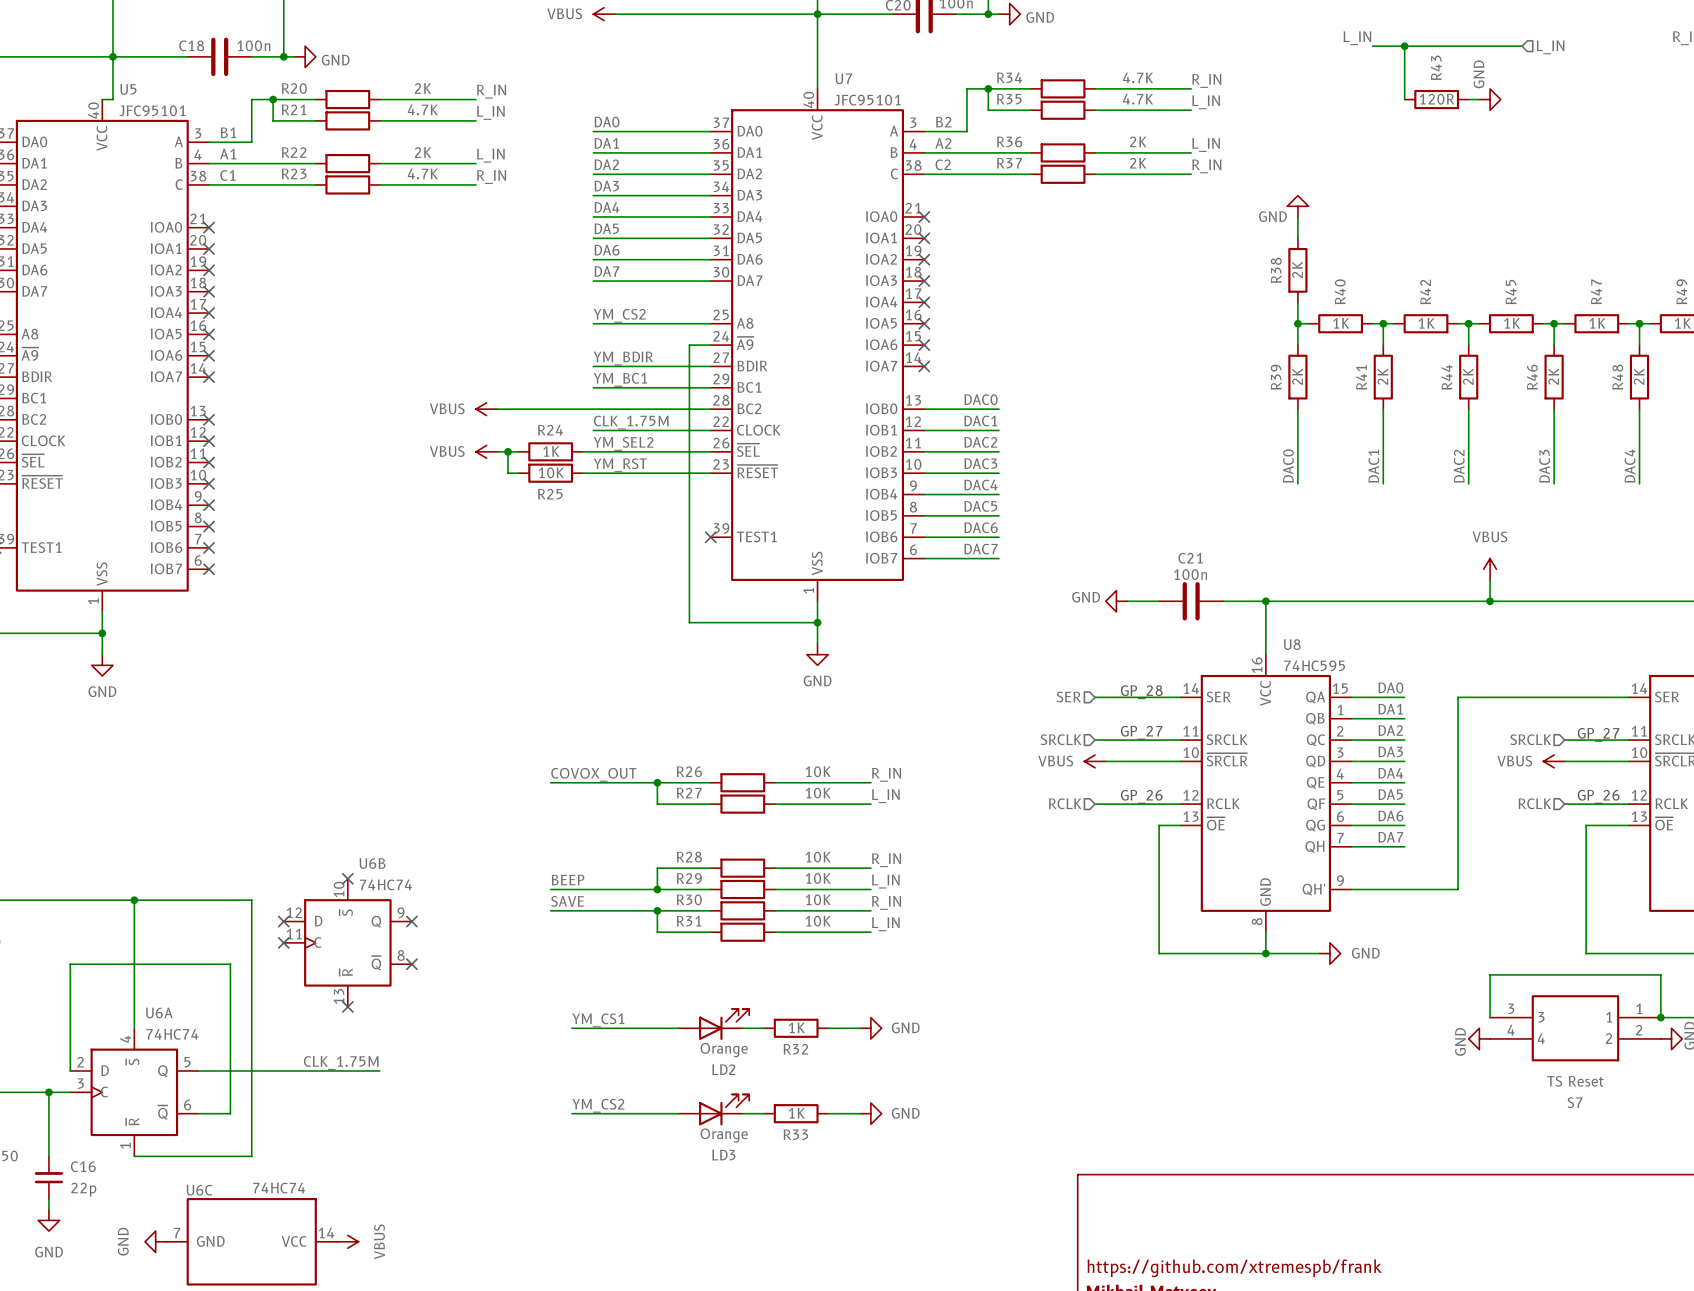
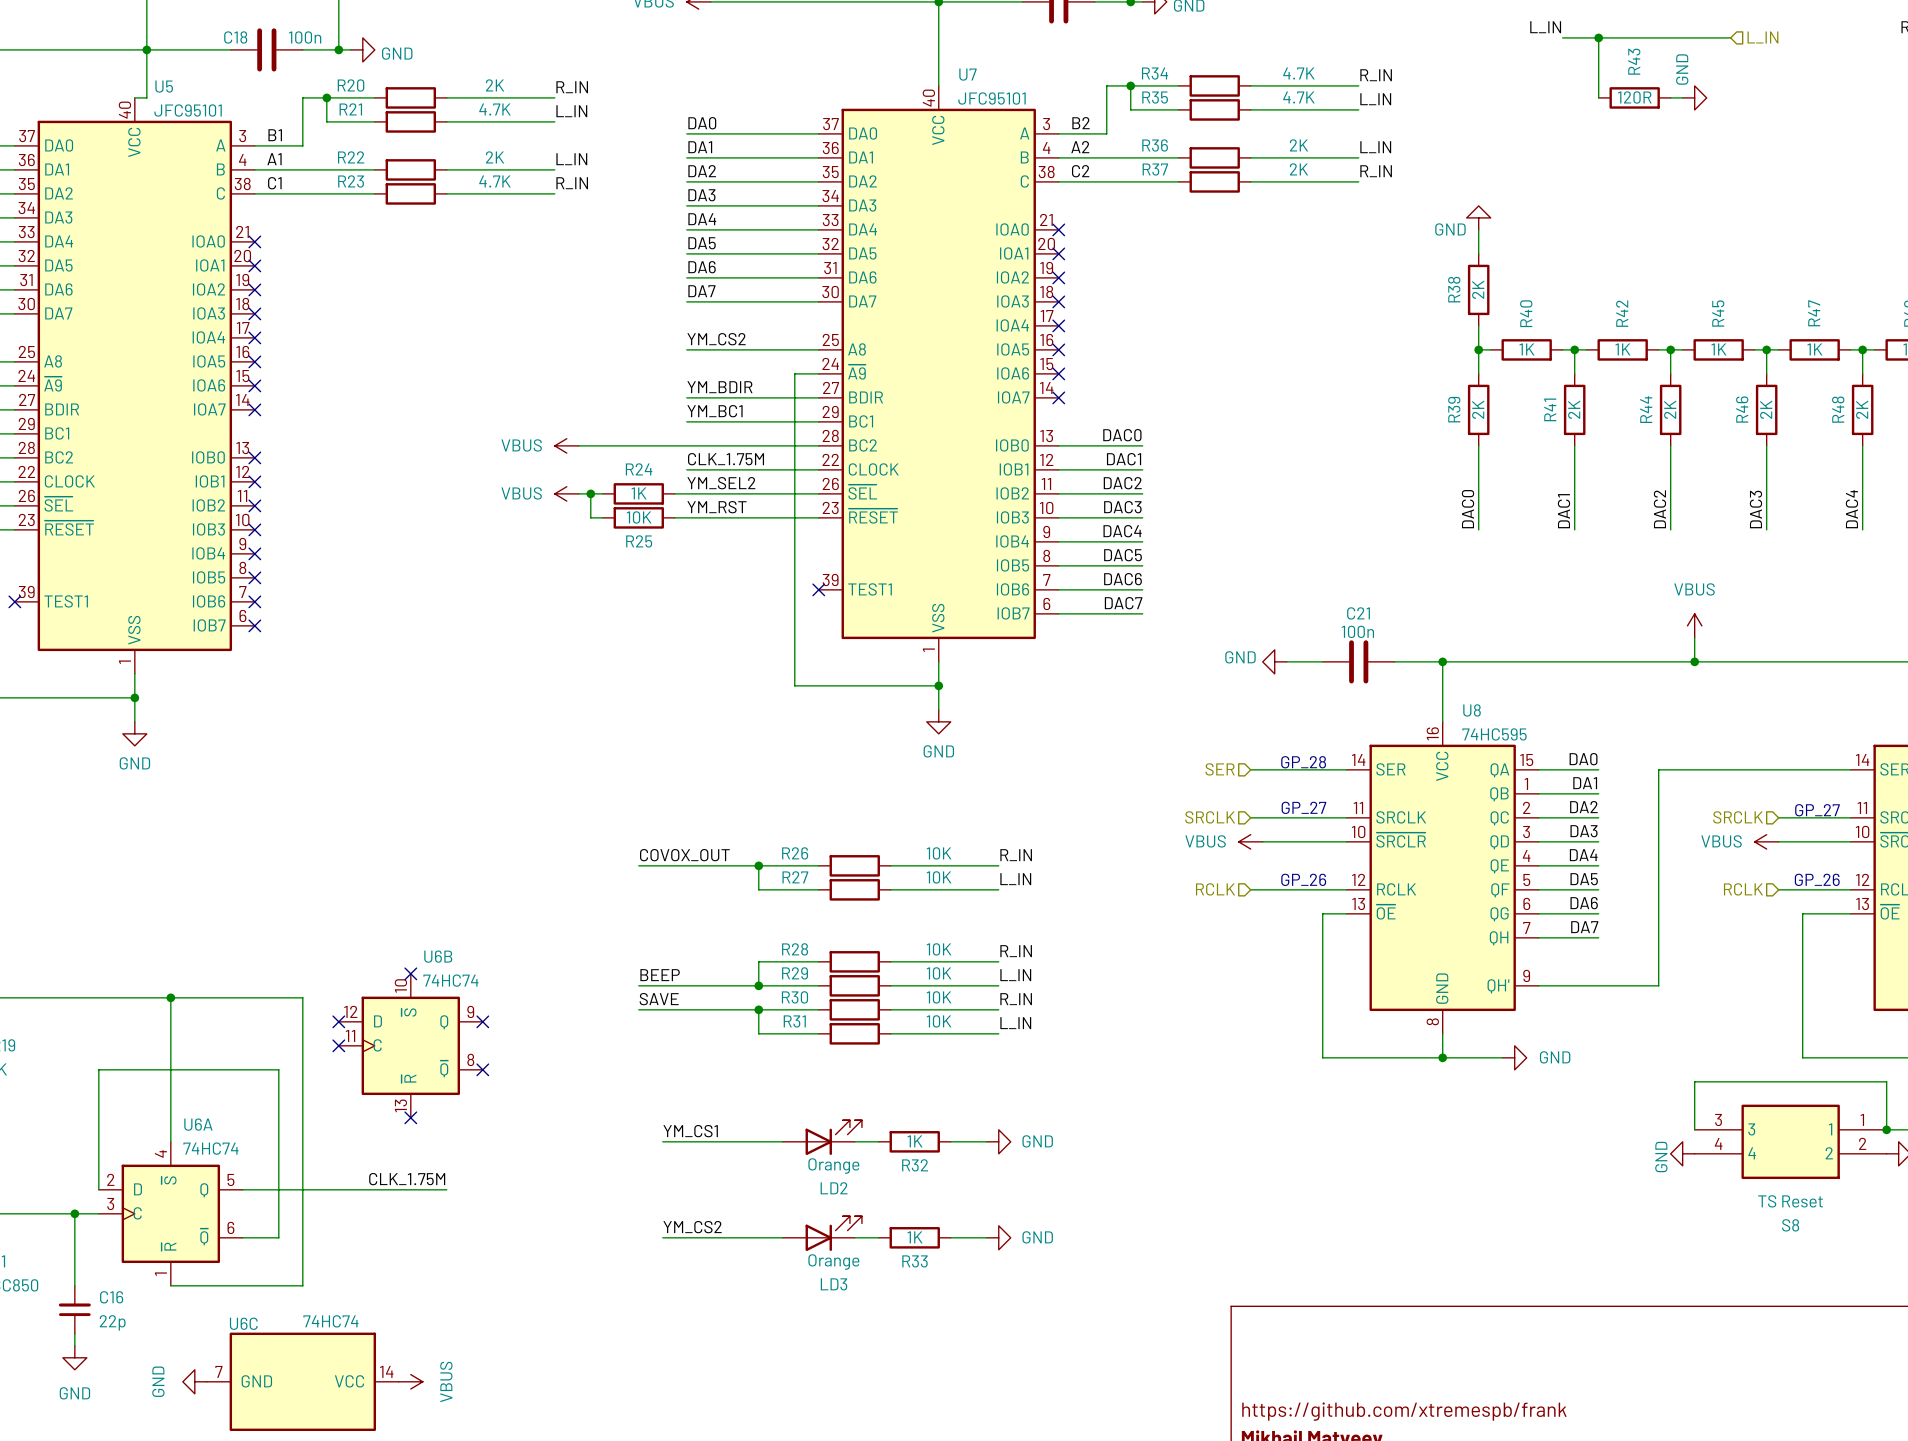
S7 name: S7 (1575, 1102) -> S8 (1790, 1225)

